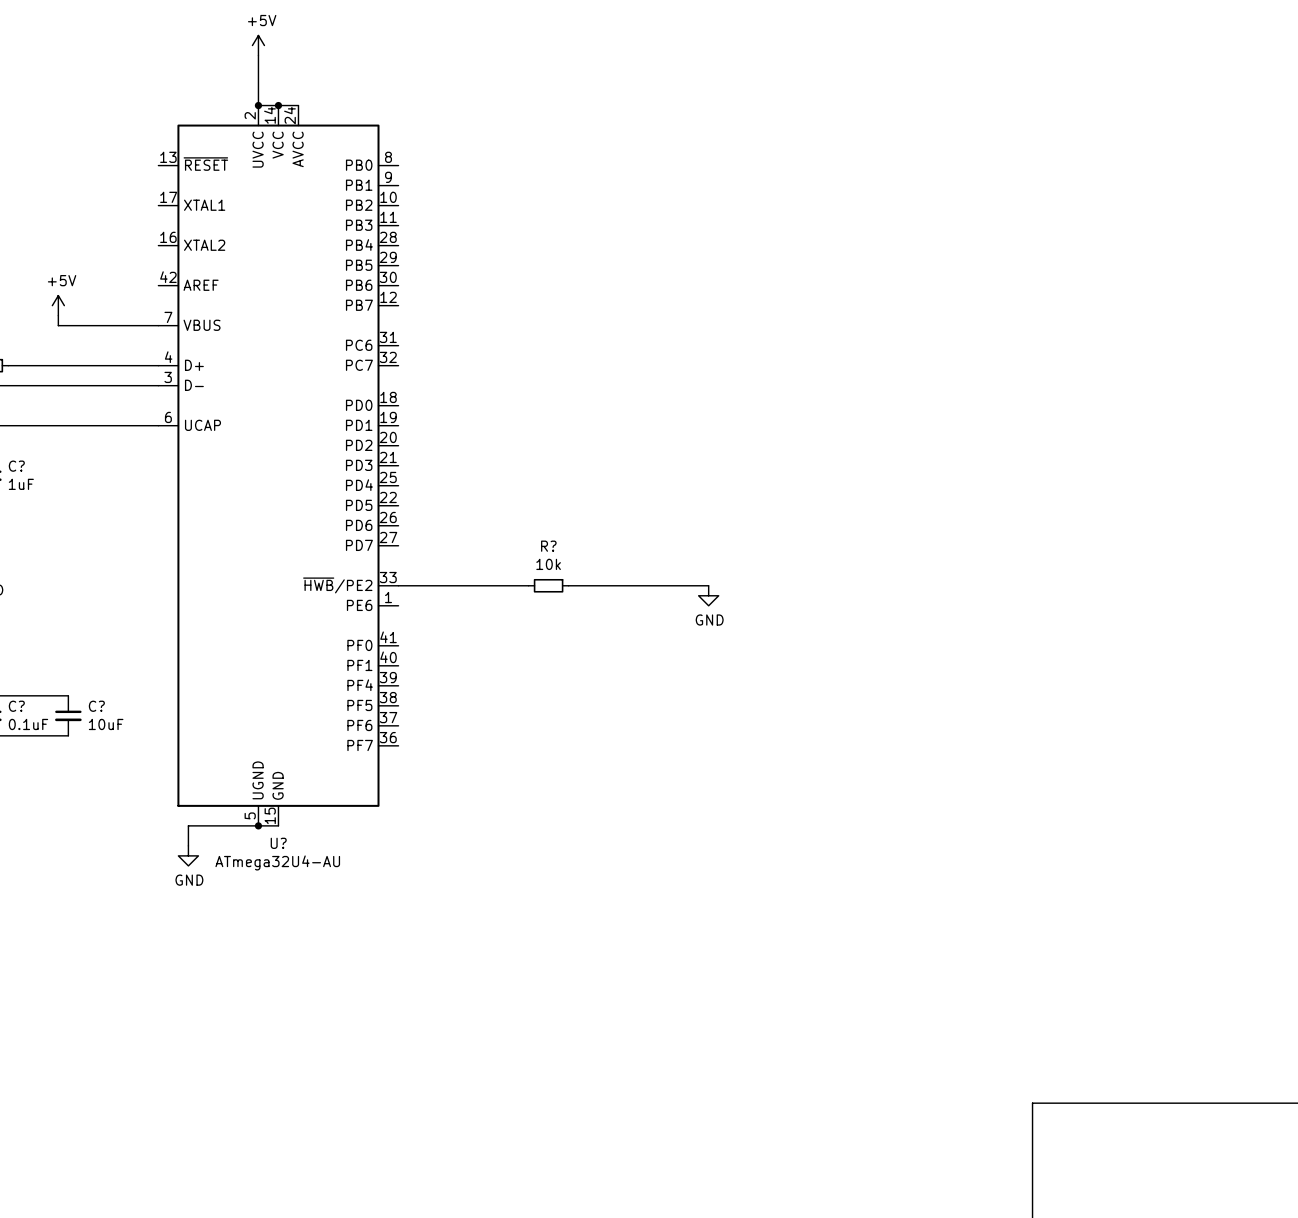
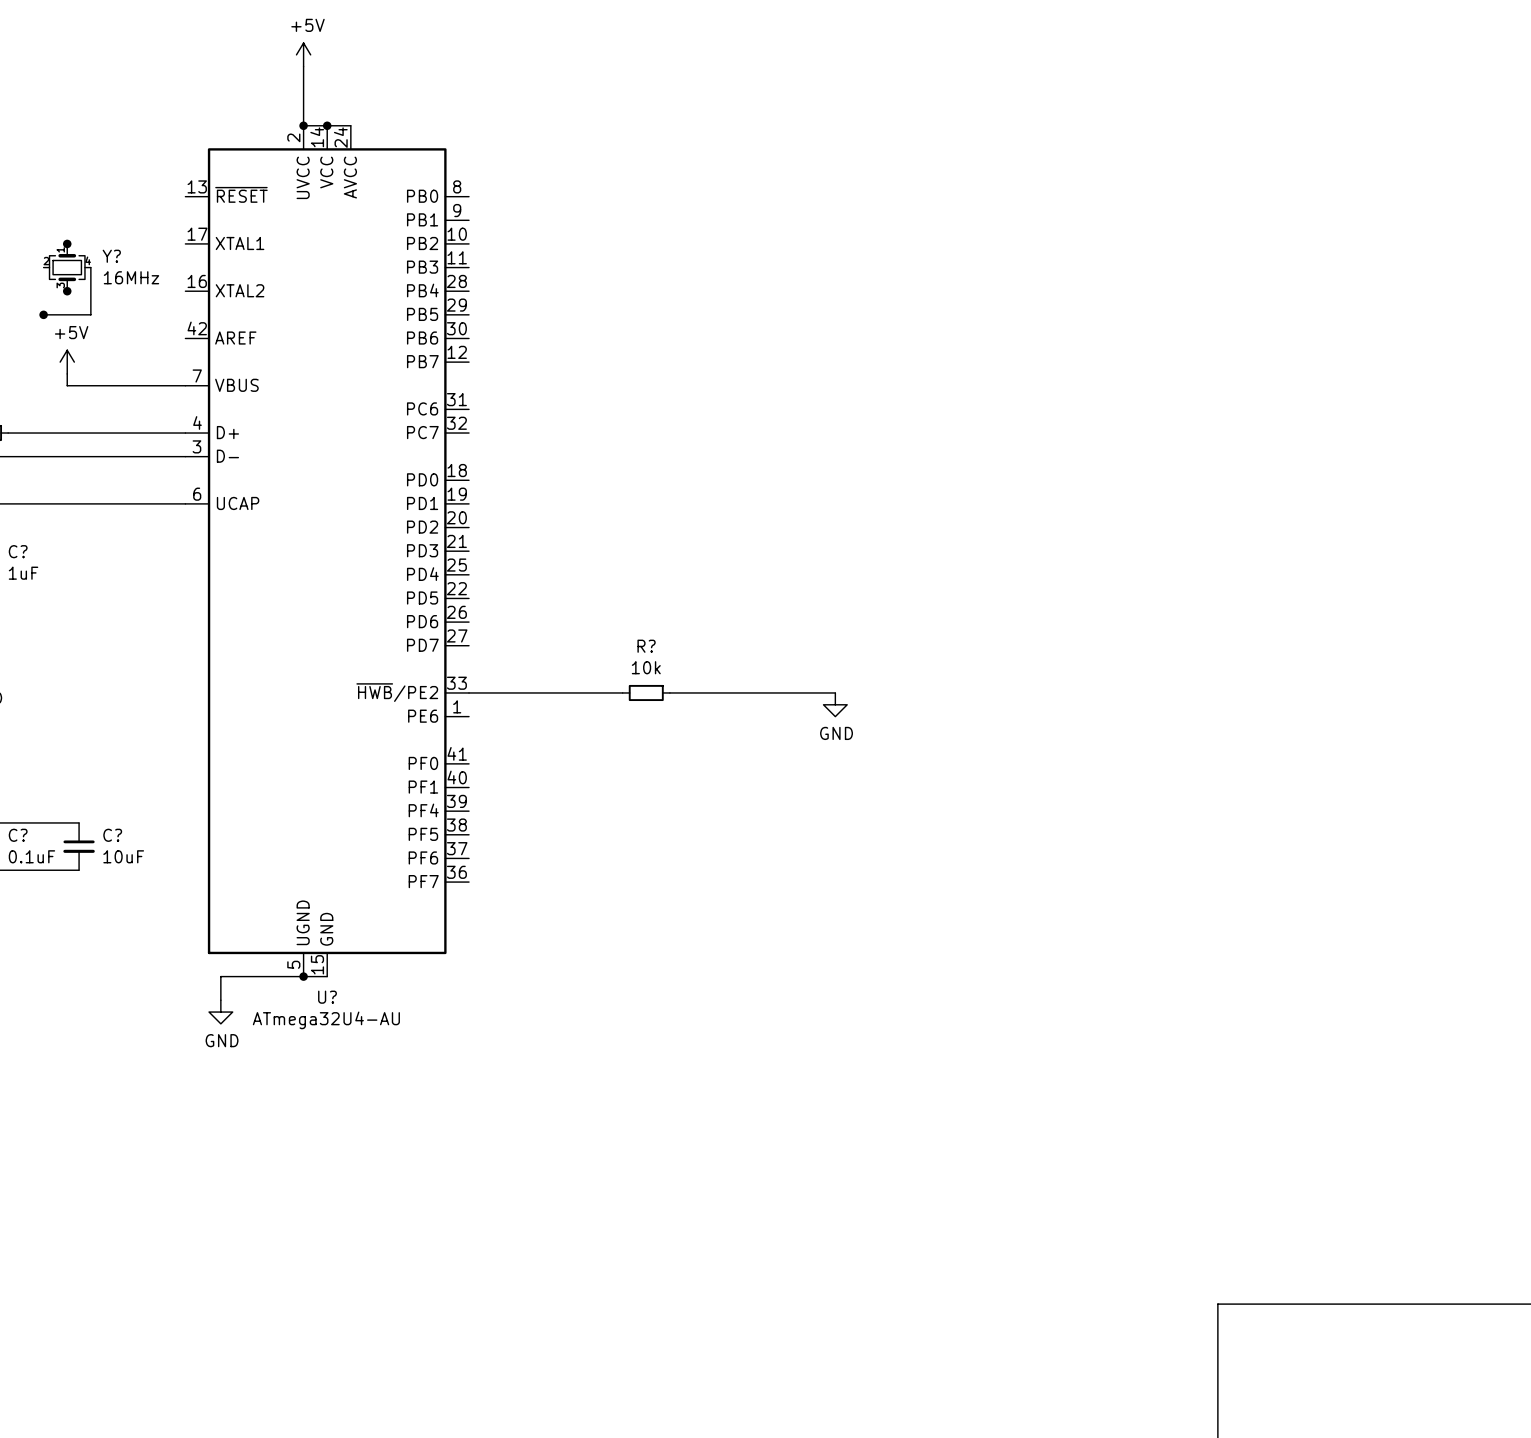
junction: none -> (67, 243)
Y?: none -> 16MHz (67, 267)
wire: none -> (90, 267) (90, 314) (43, 314)
junction: none -> (67, 291)
junction: none -> (43, 314)

